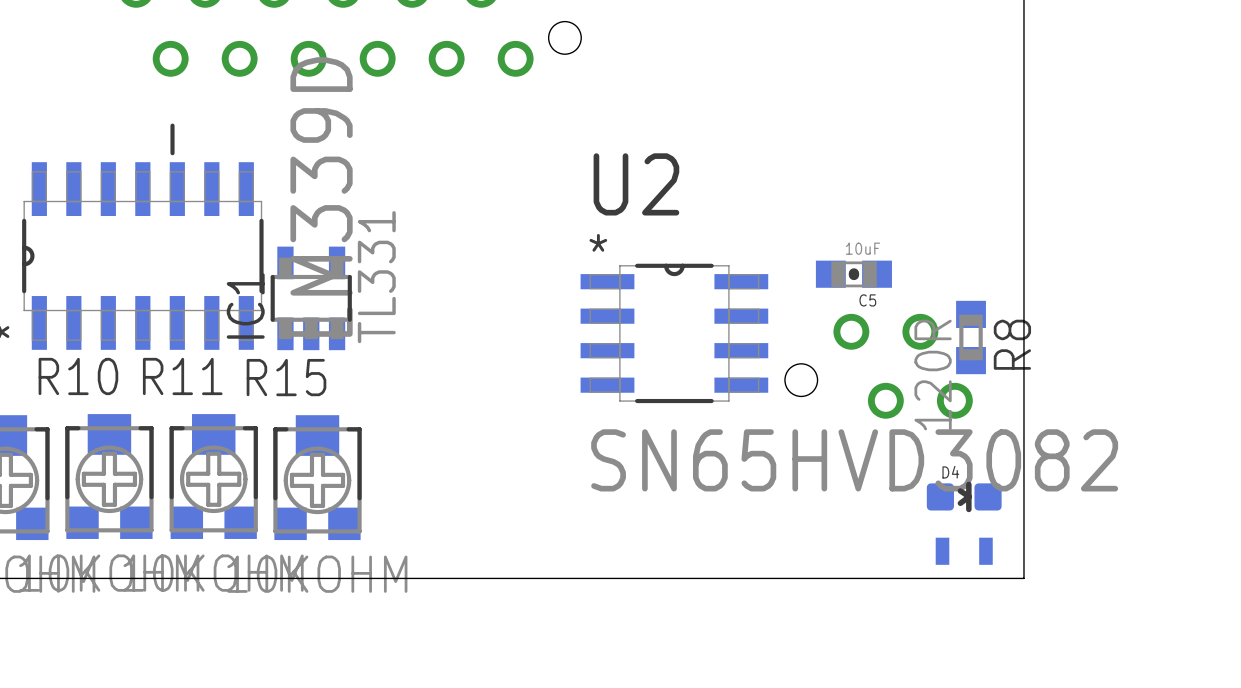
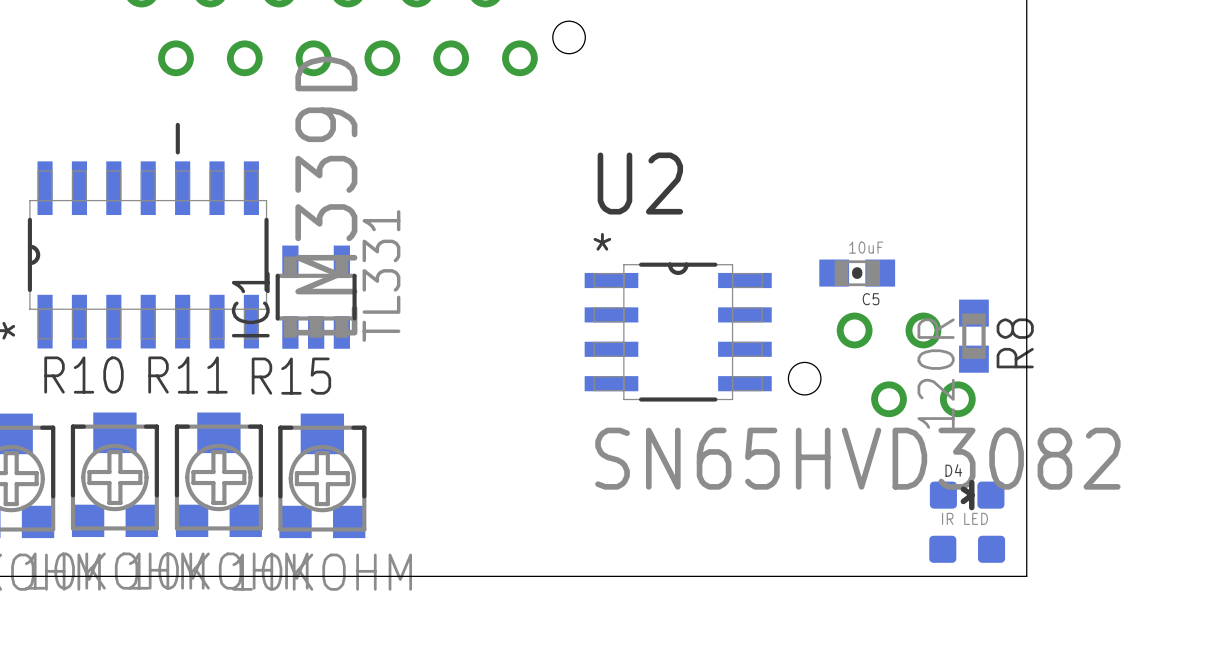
D4 value: none -> IR LED (964, 518)
part footprint: [935, 537, 993, 565] -> [929, 535, 1006, 563]

